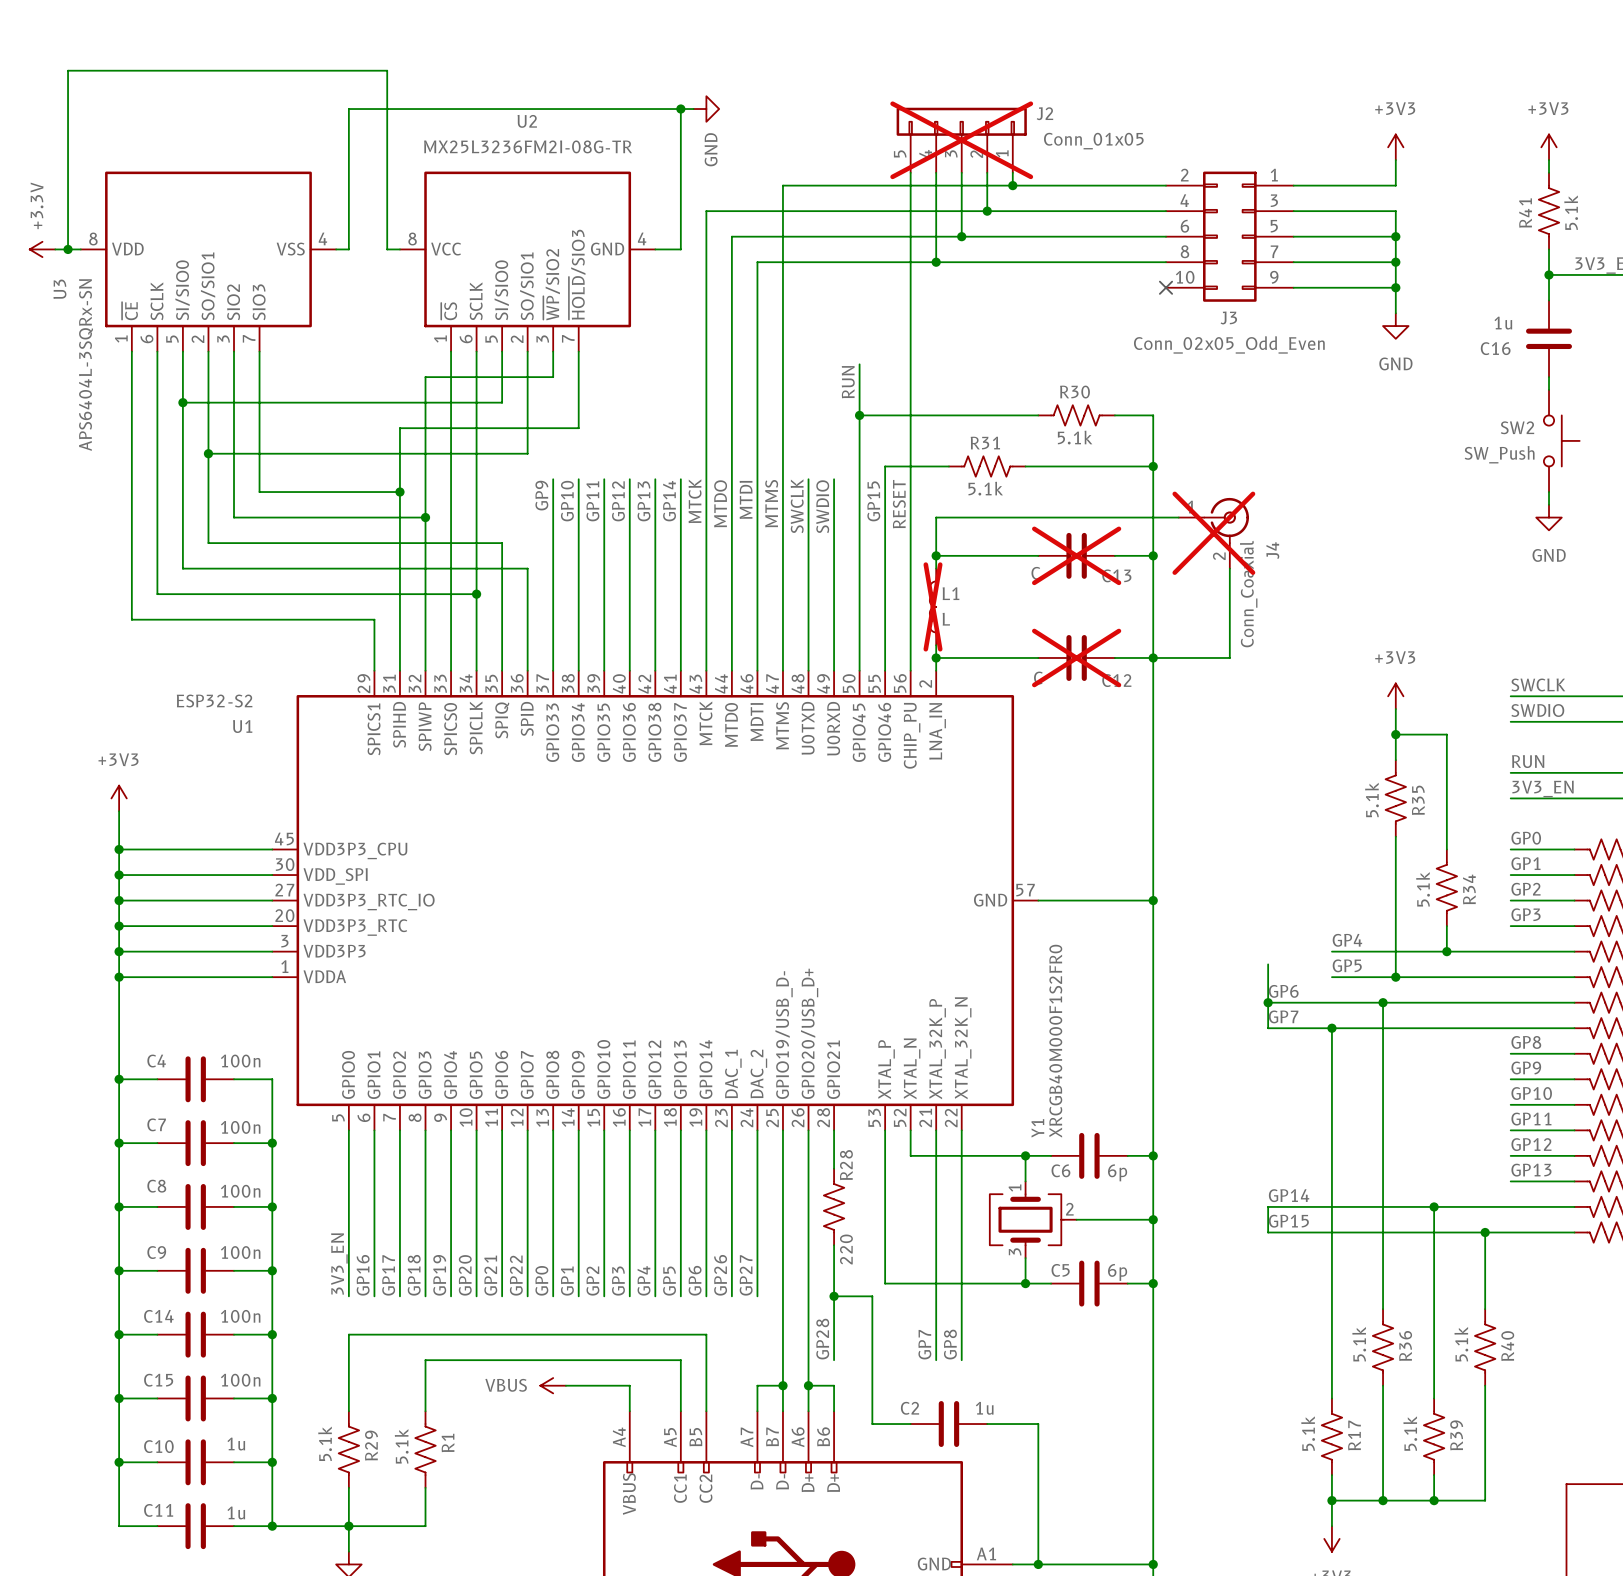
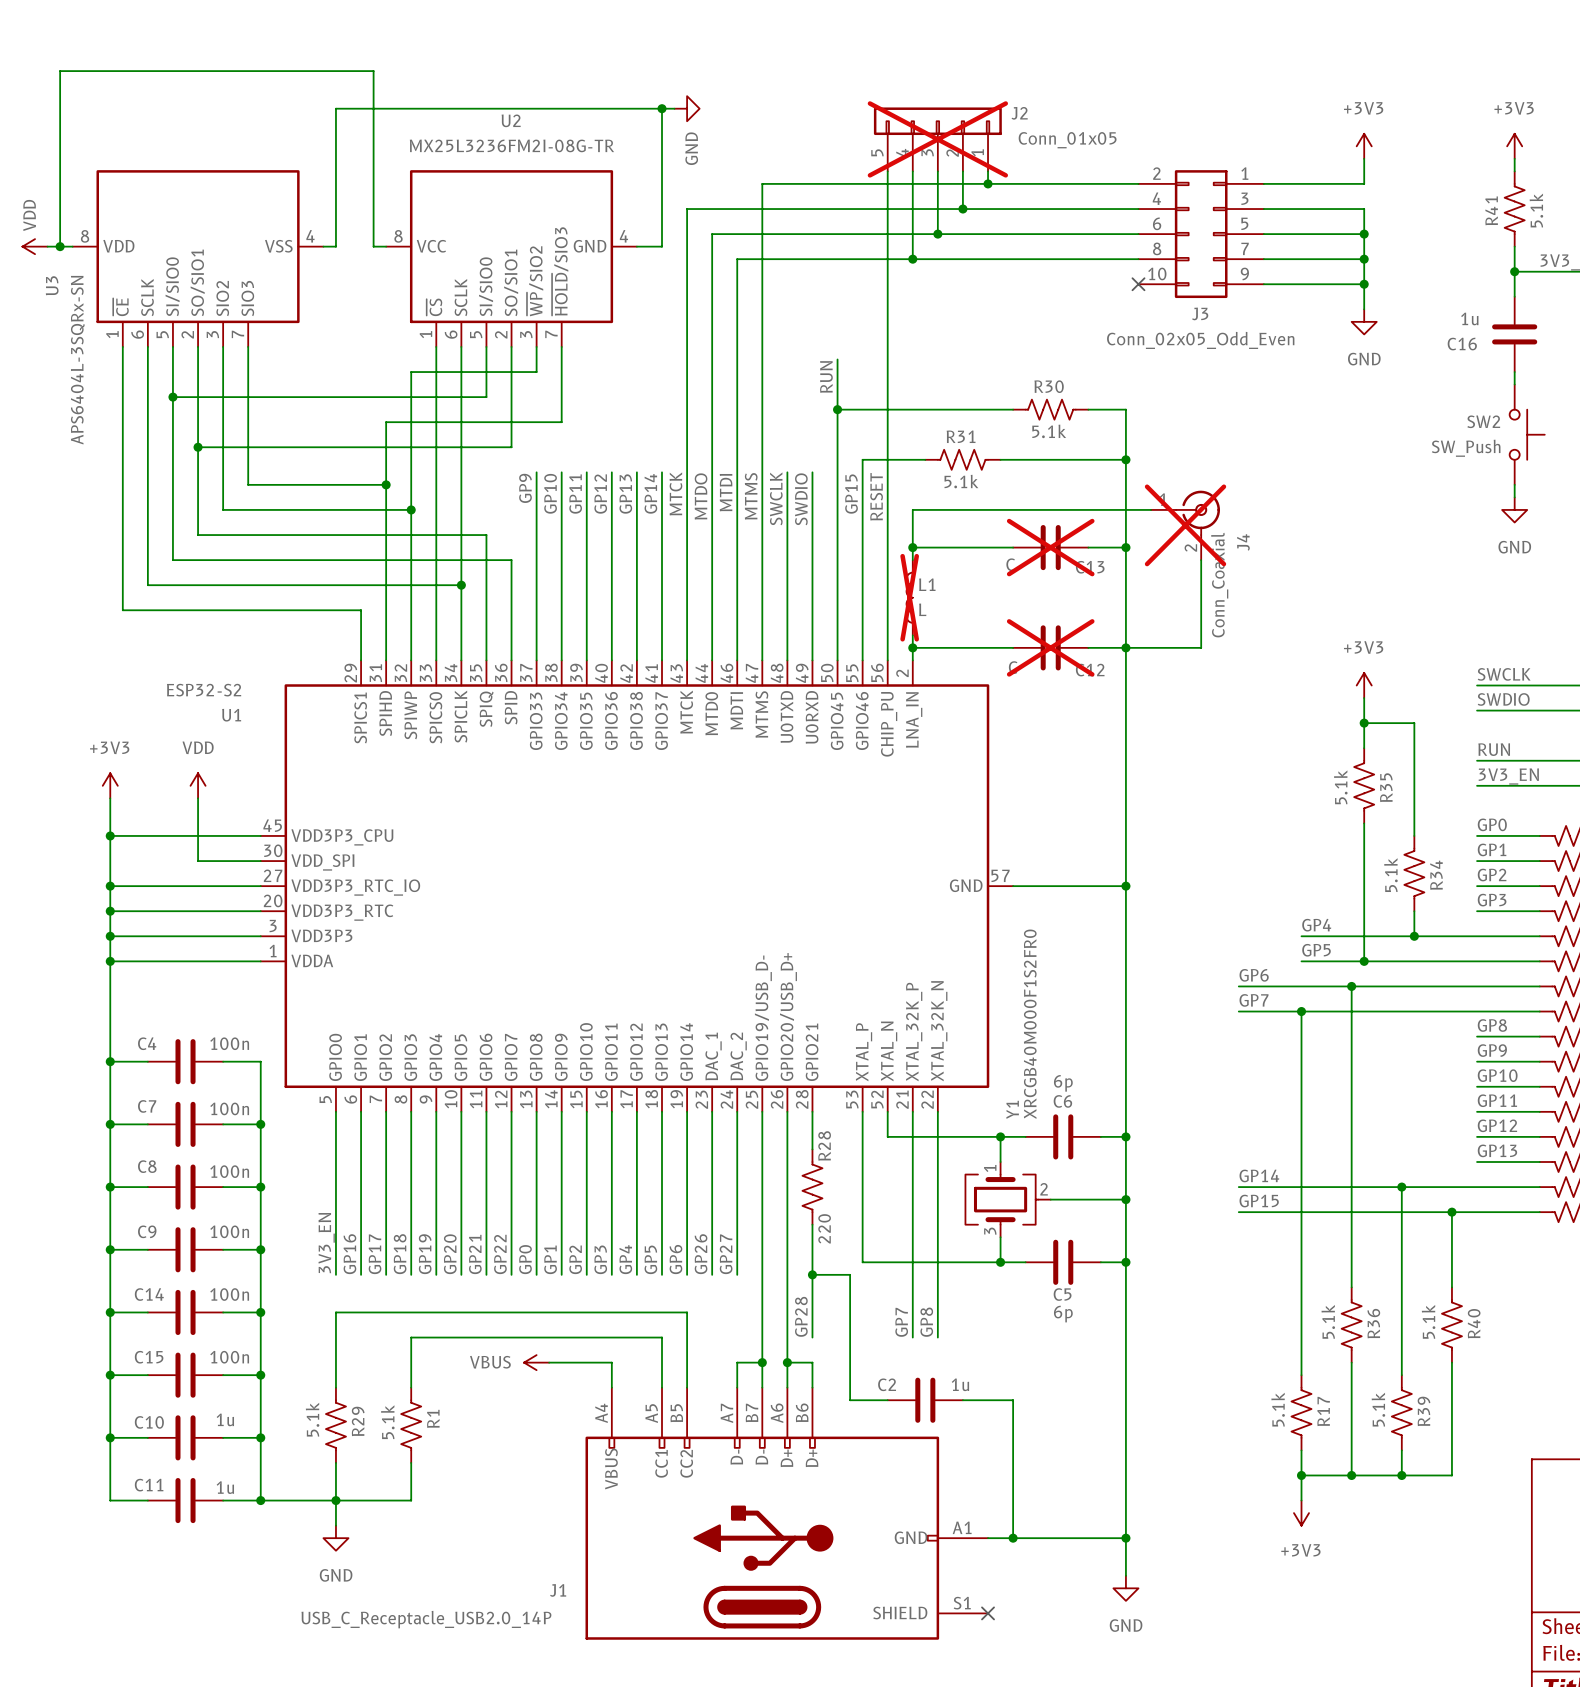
power symbol: +3.3V (42, 249) -> VDD (35, 246)
power symbol: none -> VDD (198, 785)
wire: (119, 875) (208, 875) -> (198, 798) (198, 861)
junction: (119, 875) -> none
wire: (1268, 964) (1268, 1028) -> none
junction: (1268, 1002) -> none
C6 name position: C6 (1060, 1170) -> C6 (1062, 1101)
C6 value position: 6p (1117, 1172) -> 6p (1063, 1083)
wire: (1268, 1206) (1268, 1232) -> none
C5 name position: C5 (1060, 1270) -> C5 (1062, 1294)
C5 value position: 6p (1117, 1272) -> 6p (1063, 1314)

